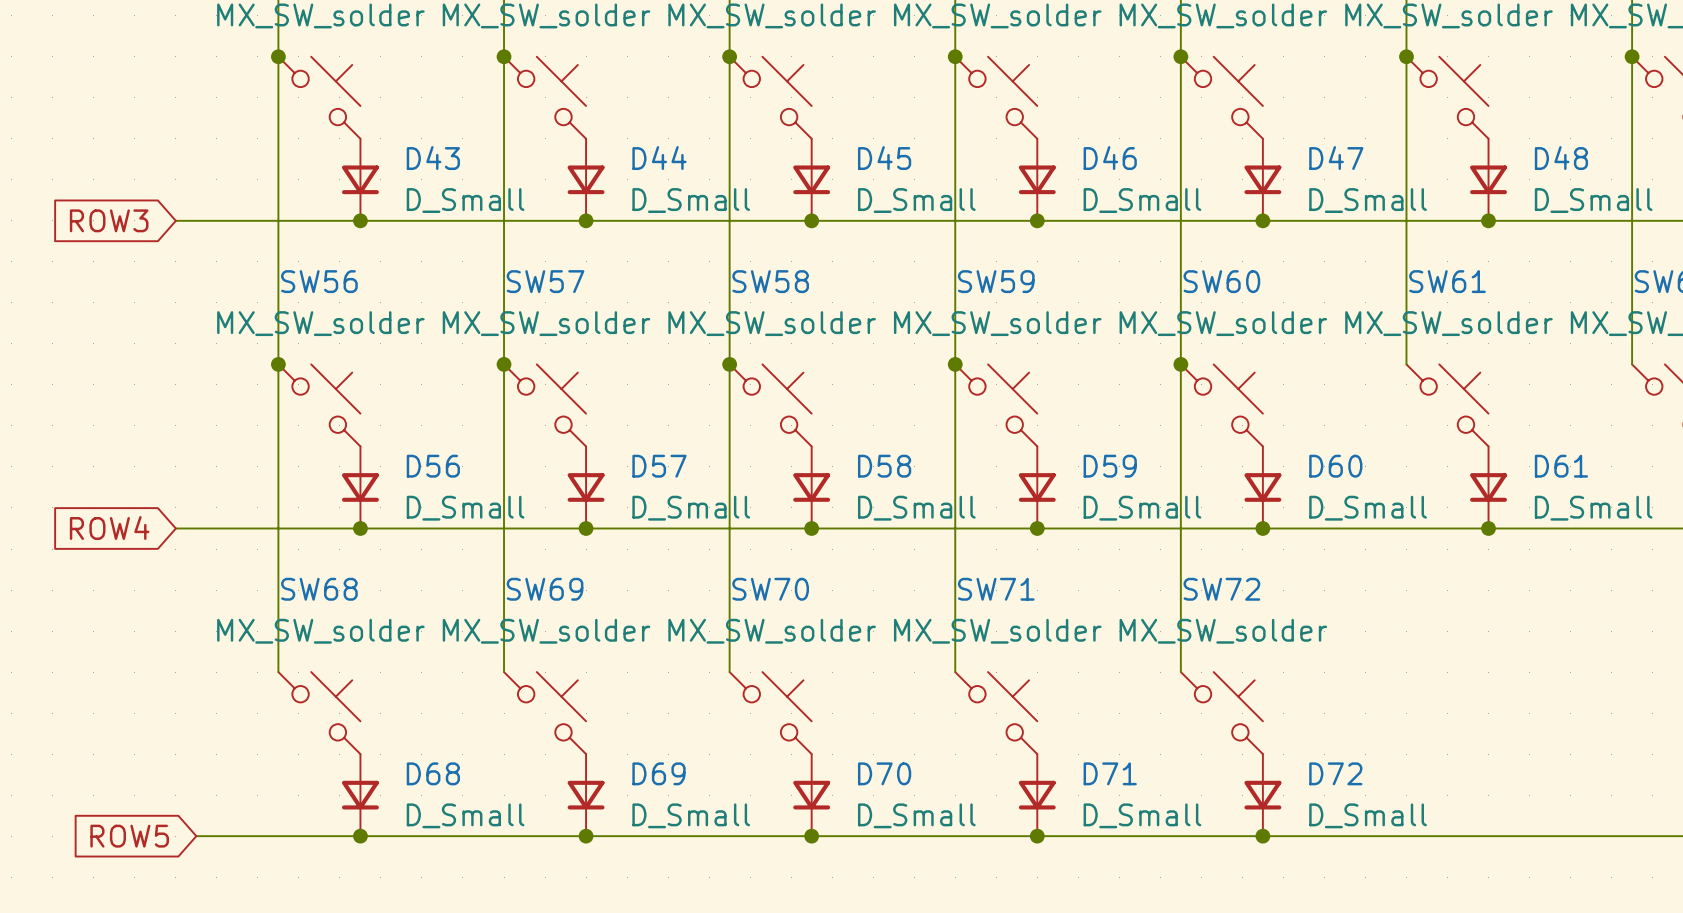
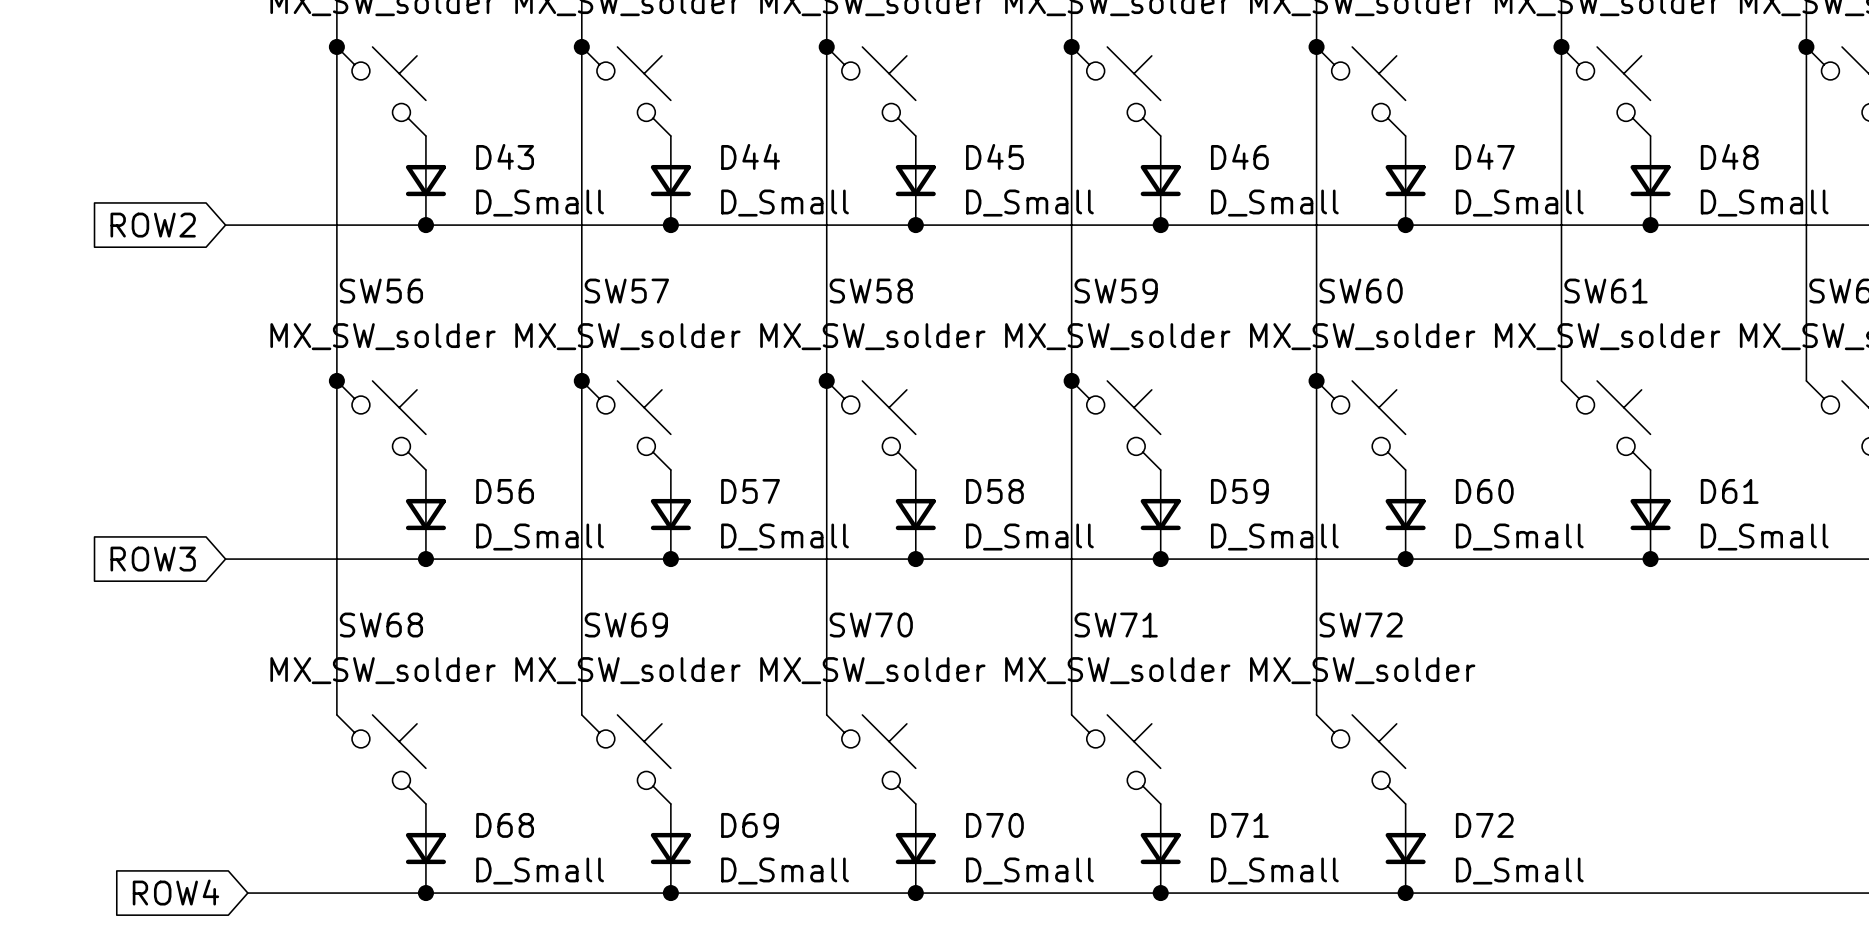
global label: ROW3 (109, 220) -> ROW2 (153, 225)
global label: ROW4 (109, 528) -> ROW3 (153, 559)
global label: ROW5 (129, 836) -> ROW4 (175, 892)

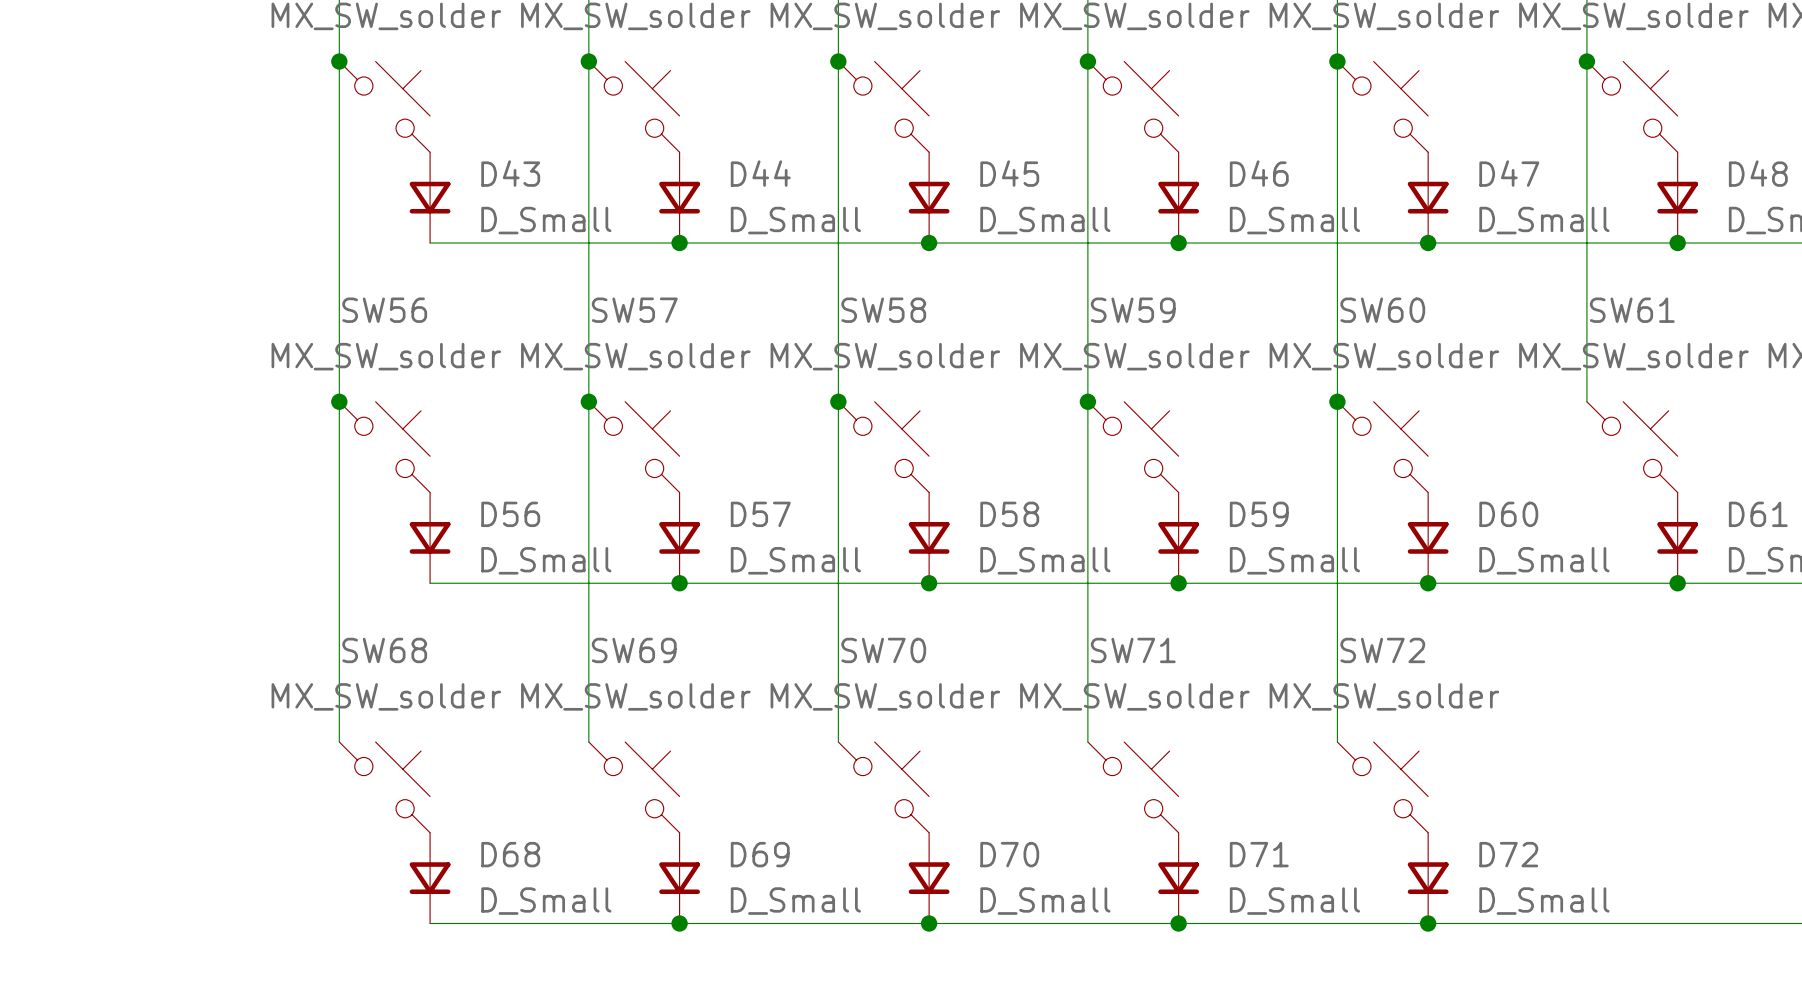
global label: ROW2 (153, 225) -> none
wire: (225, 225) (425, 225) -> none
junction: (425, 225) -> none
global label: ROW3 (153, 559) -> none
wire: (225, 559) (425, 559) -> none
junction: (425, 559) -> none
global label: ROW4 (175, 892) -> none
wire: (247, 893) (425, 893) -> none
junction: (425, 893) -> none

